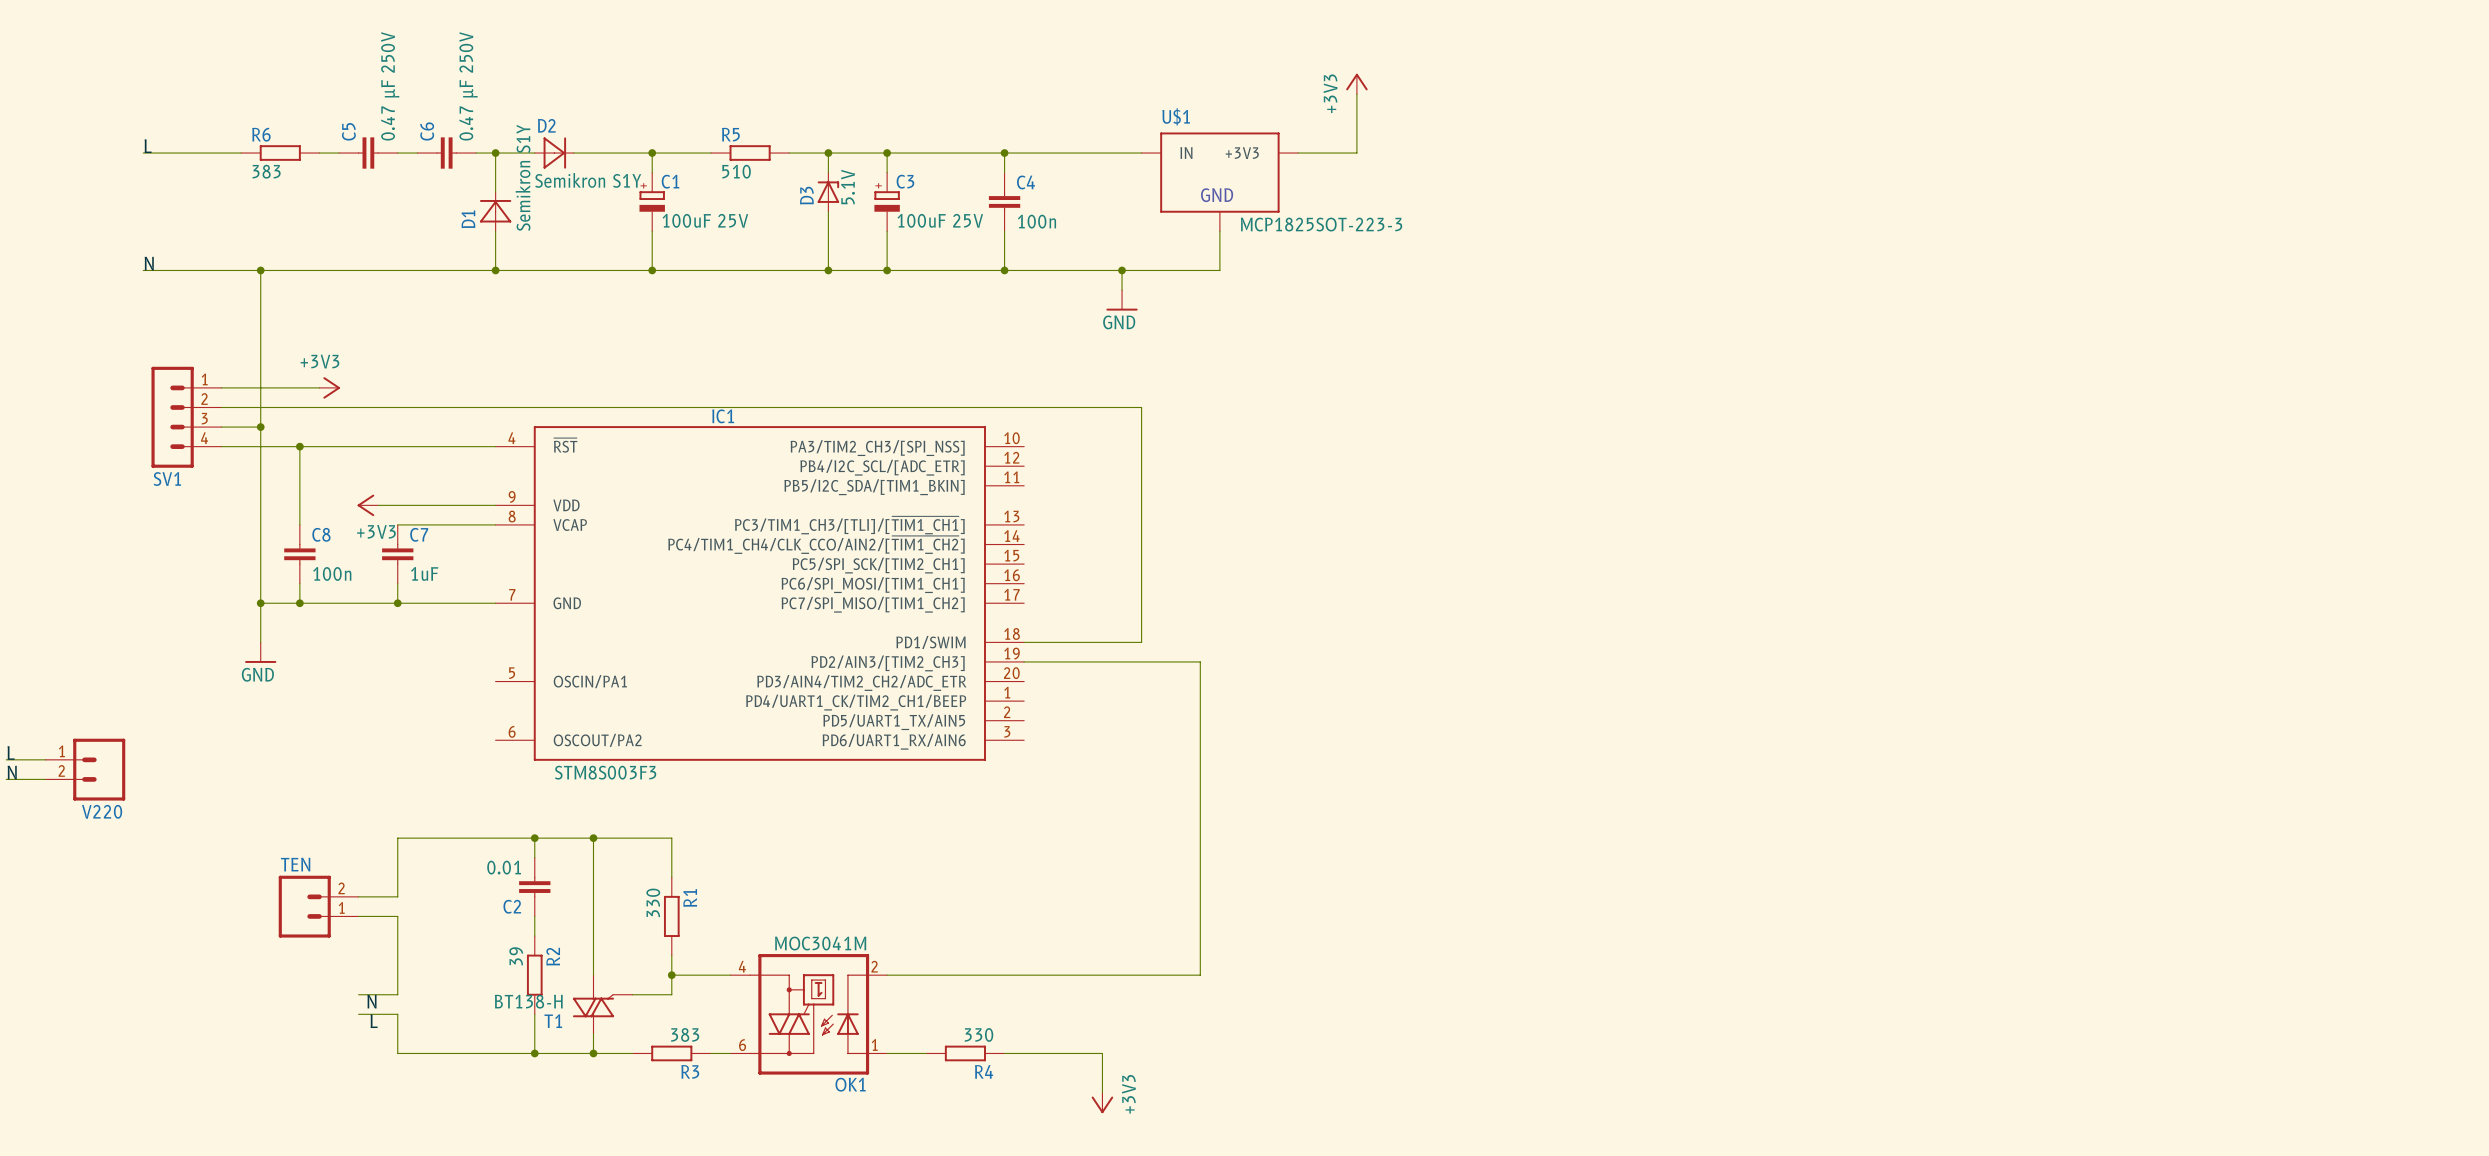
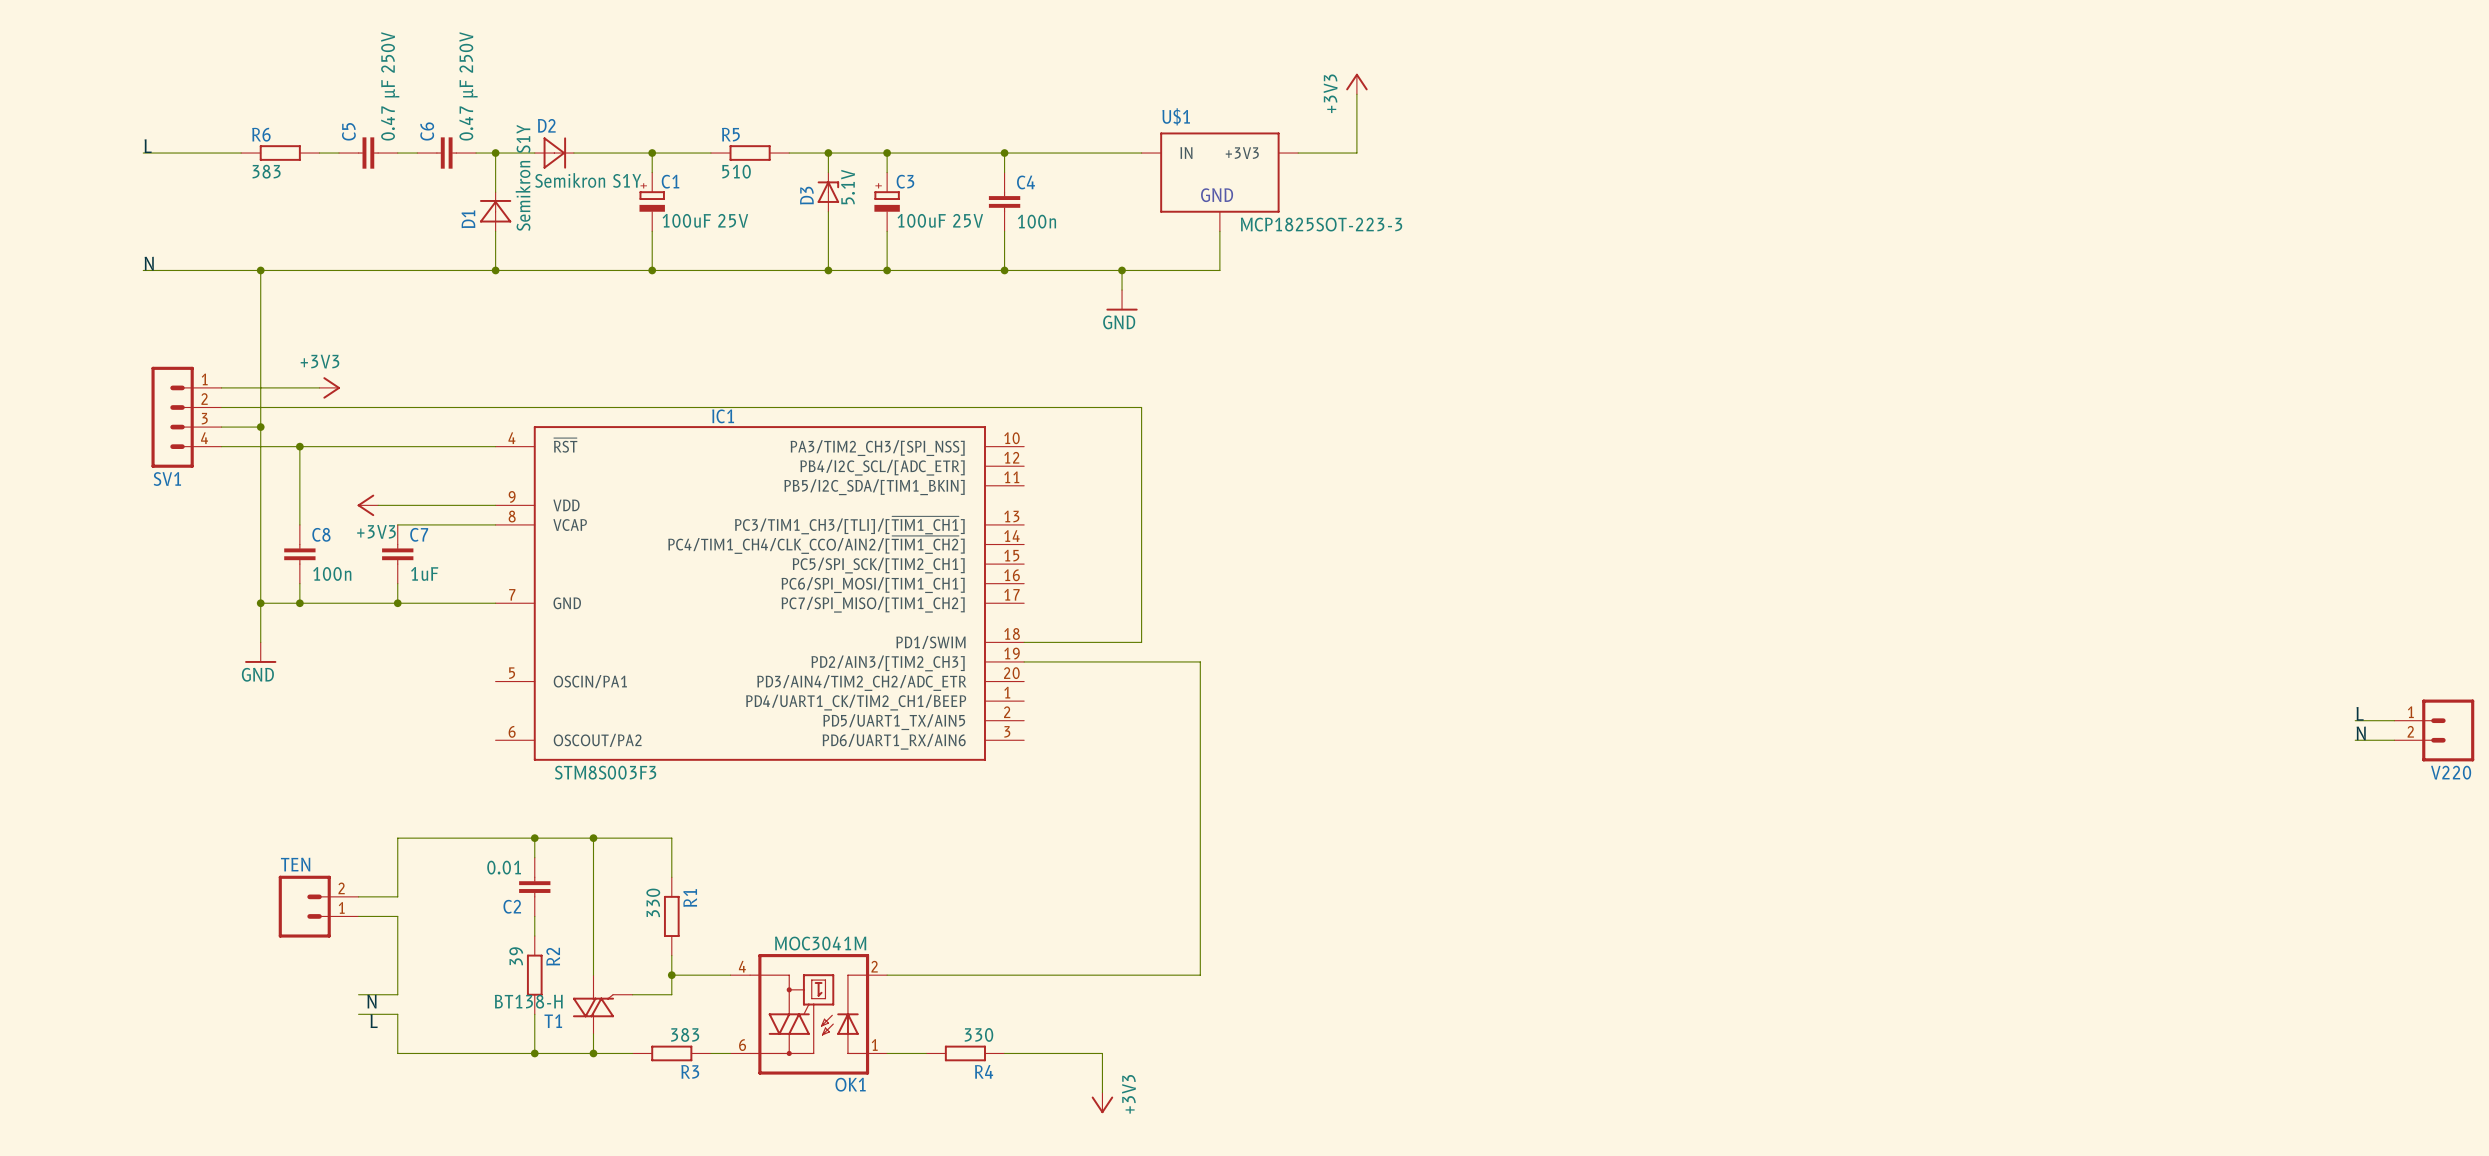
label: none -> L (2360, 713)
wire: none -> (2355, 720) (2394, 720)
label: none -> N (2361, 733)
wire: none -> (2355, 740) (2394, 740)
label: L (11, 752) -> none
wire: (6, 759) (45, 759) -> none
V220 position: (85, 769) -> (2434, 730)
label: N (12, 772) -> none
wire: (6, 779) (45, 779) -> none

